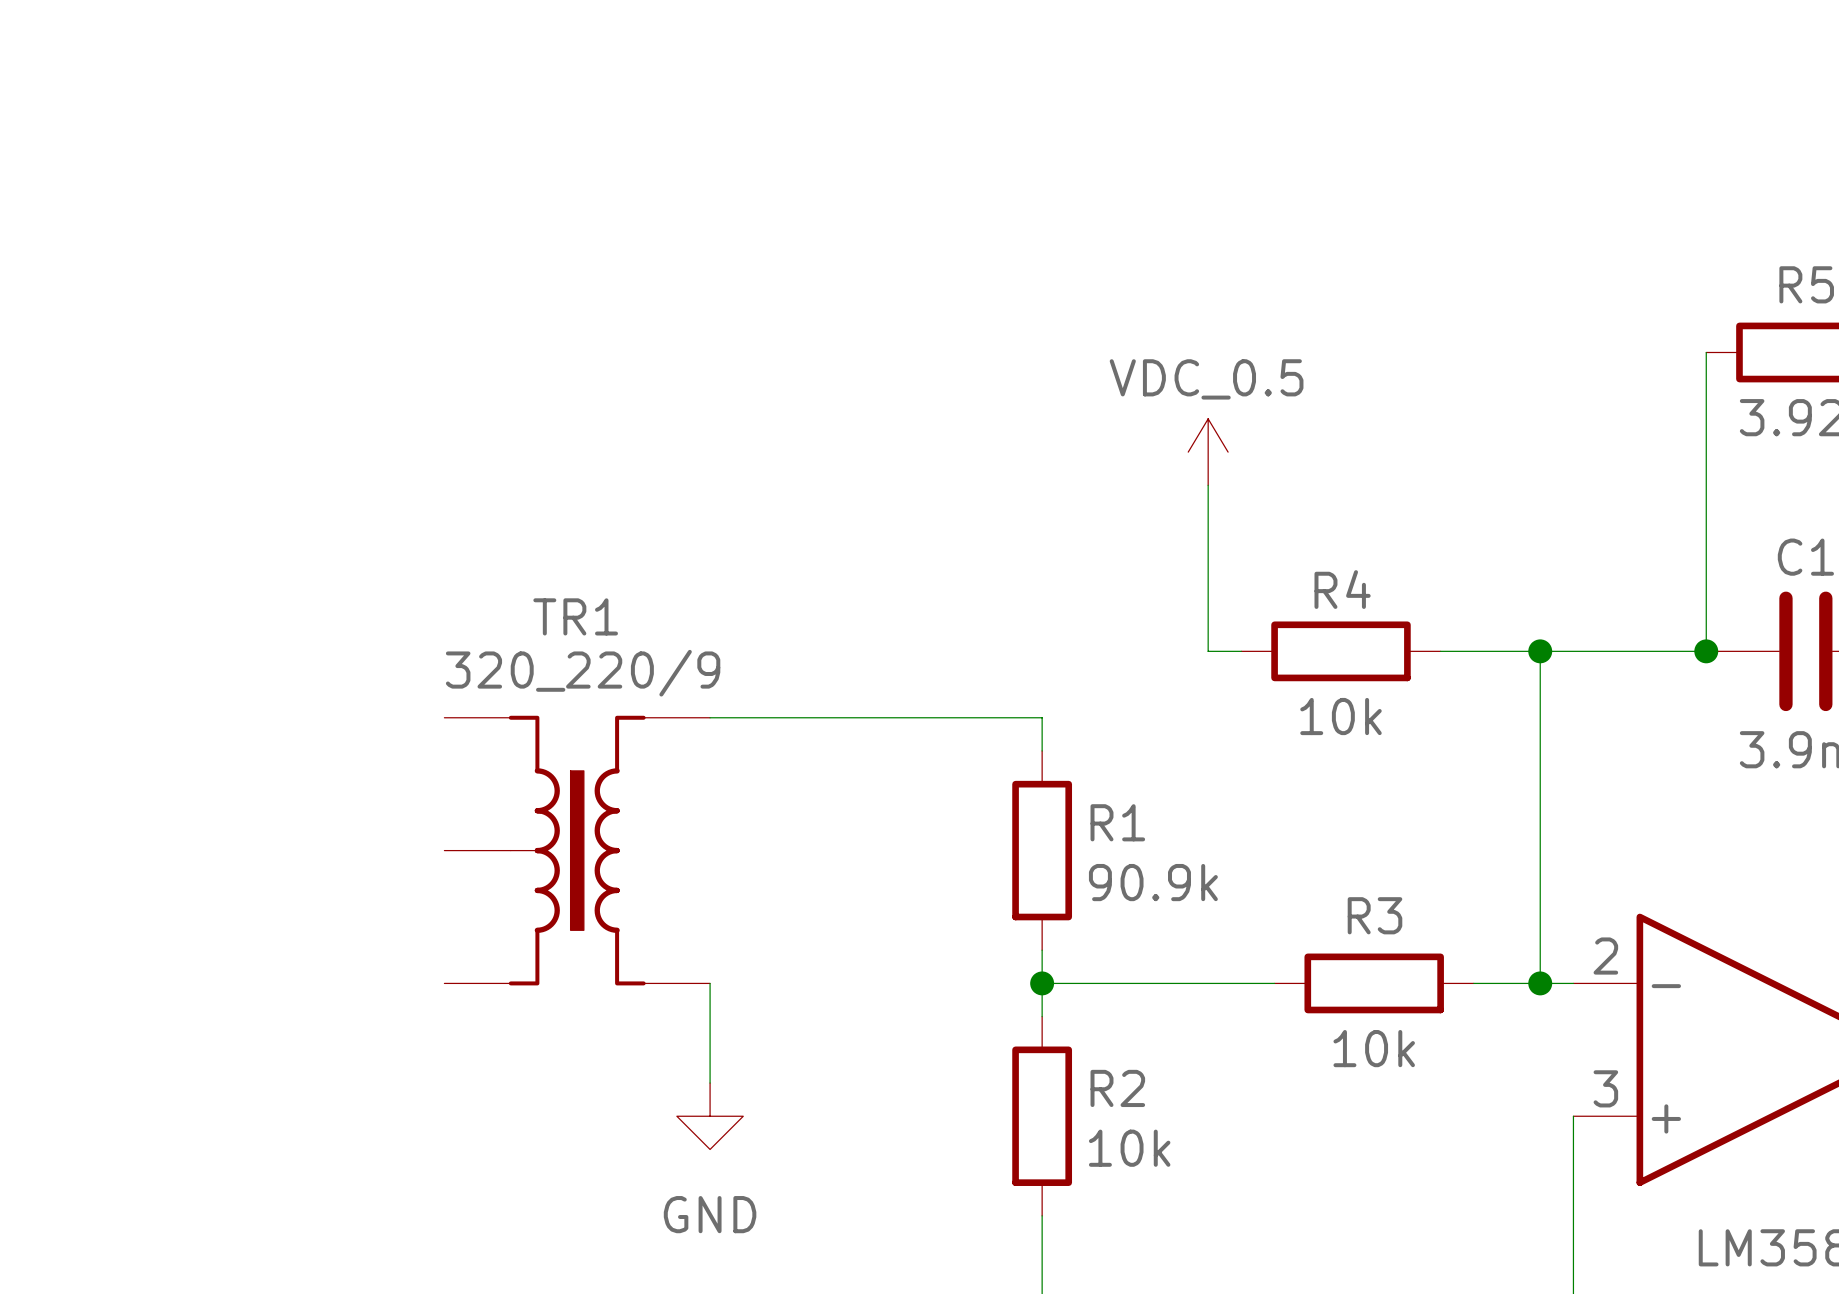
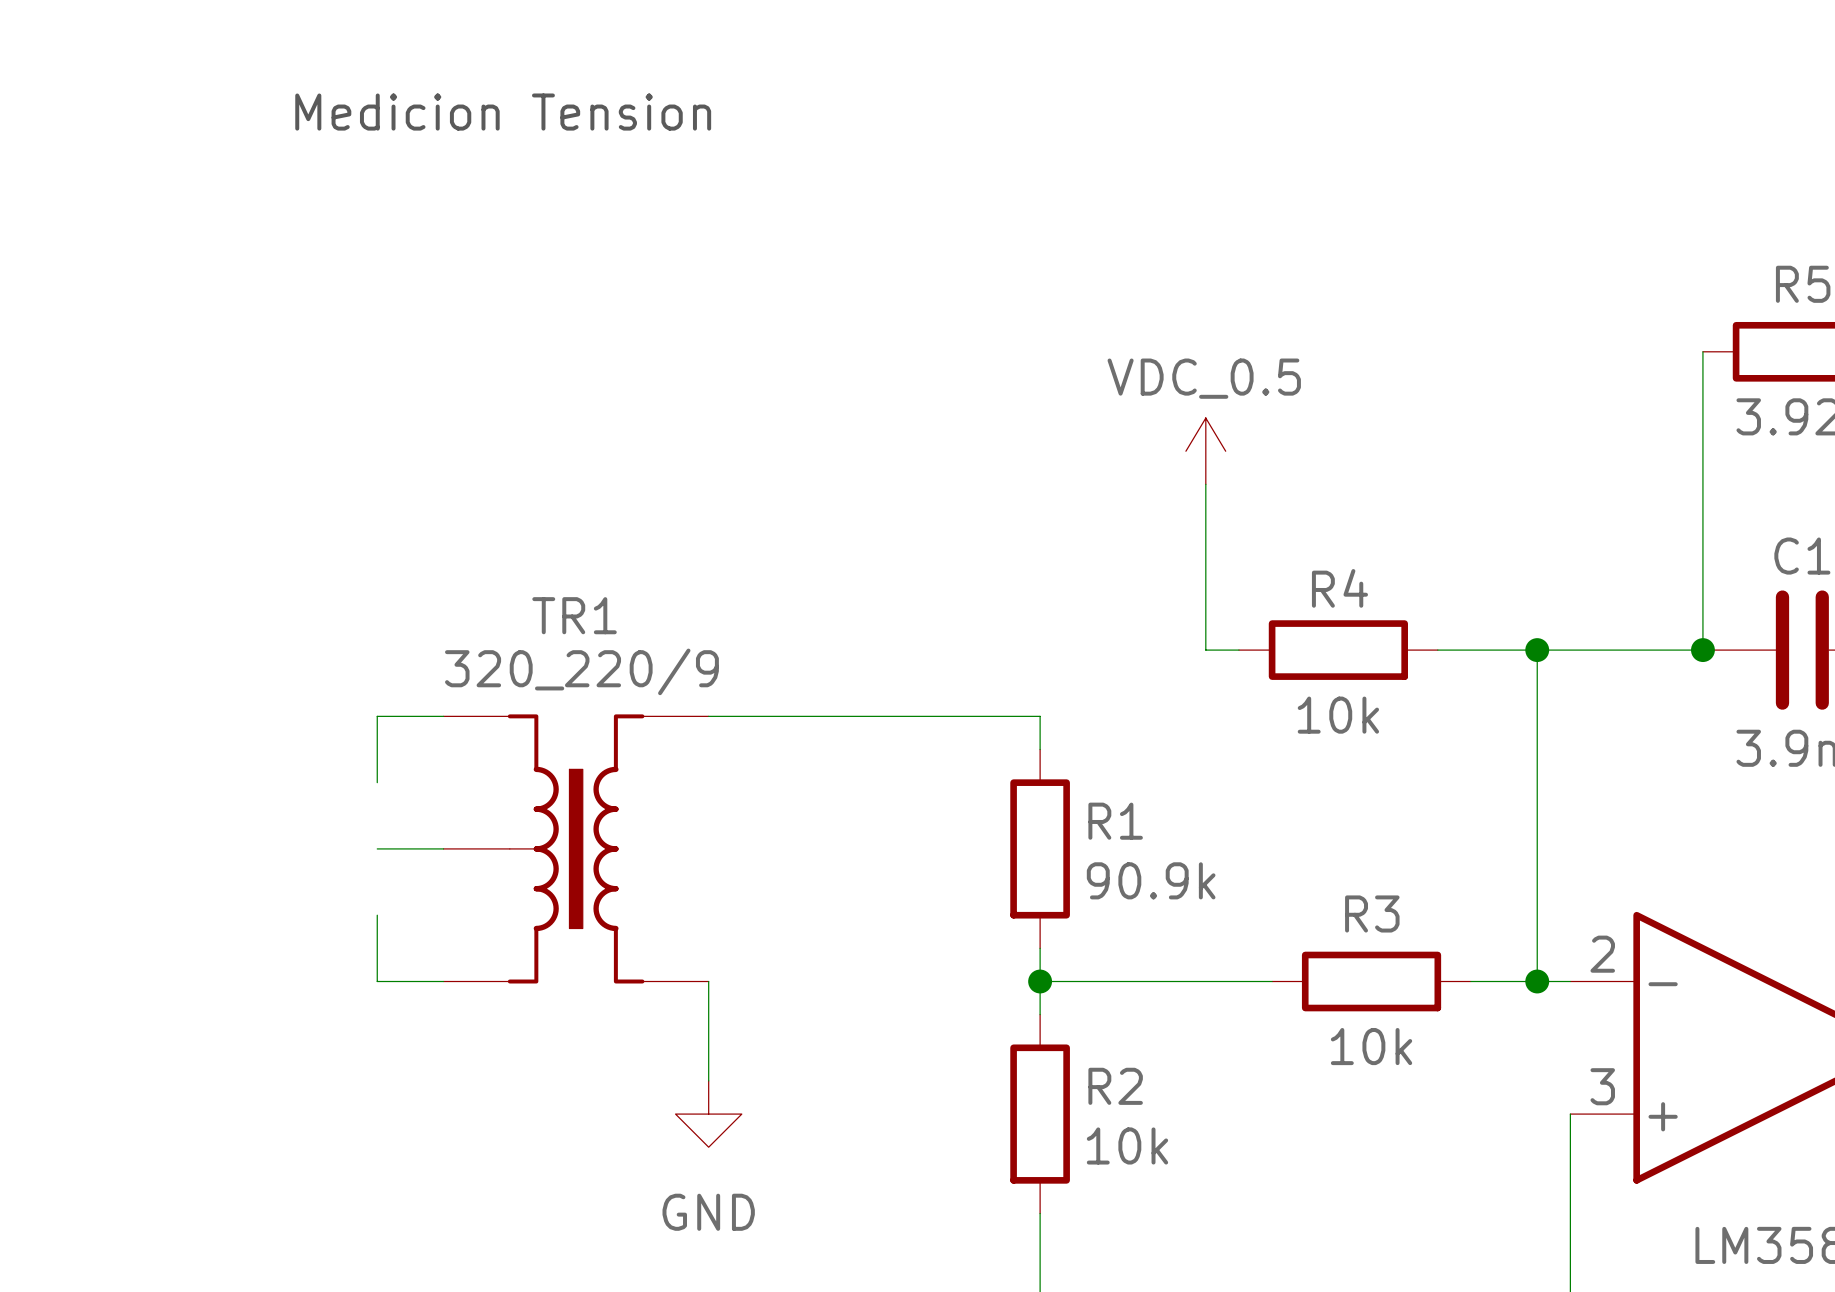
text: none -> Medicion Tension (503, 112)
wire: none -> (443, 716) (377, 716) (377, 782)
wire: none -> (377, 848) (443, 848)
wire: none -> (377, 915) (377, 981) (443, 981)

